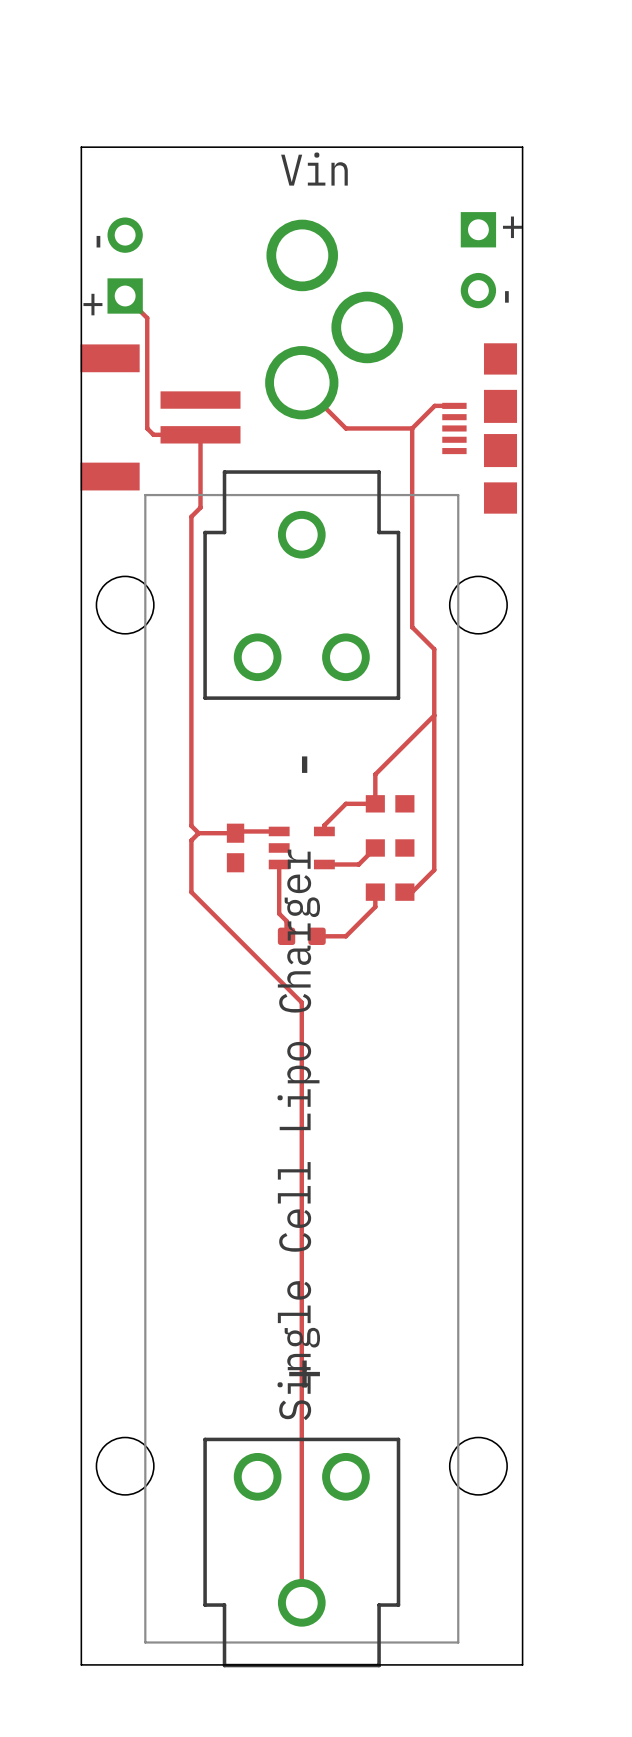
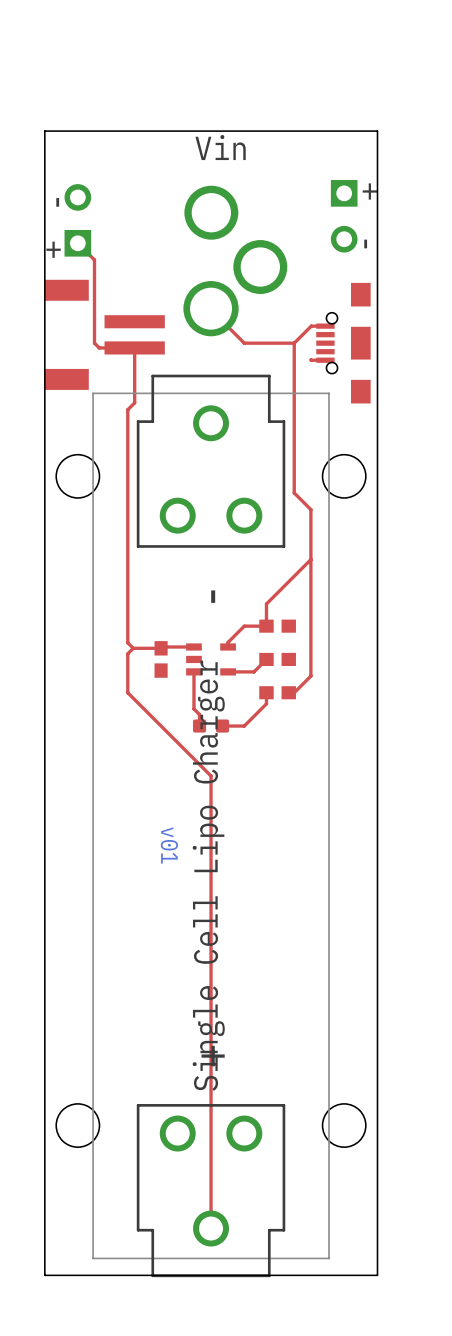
part footprint: [442, 343, 518, 514] -> [316, 282, 371, 404]
top track: none -> (310, 359) (325, 360)
drawing: none -> [160, 827, 179, 864]

